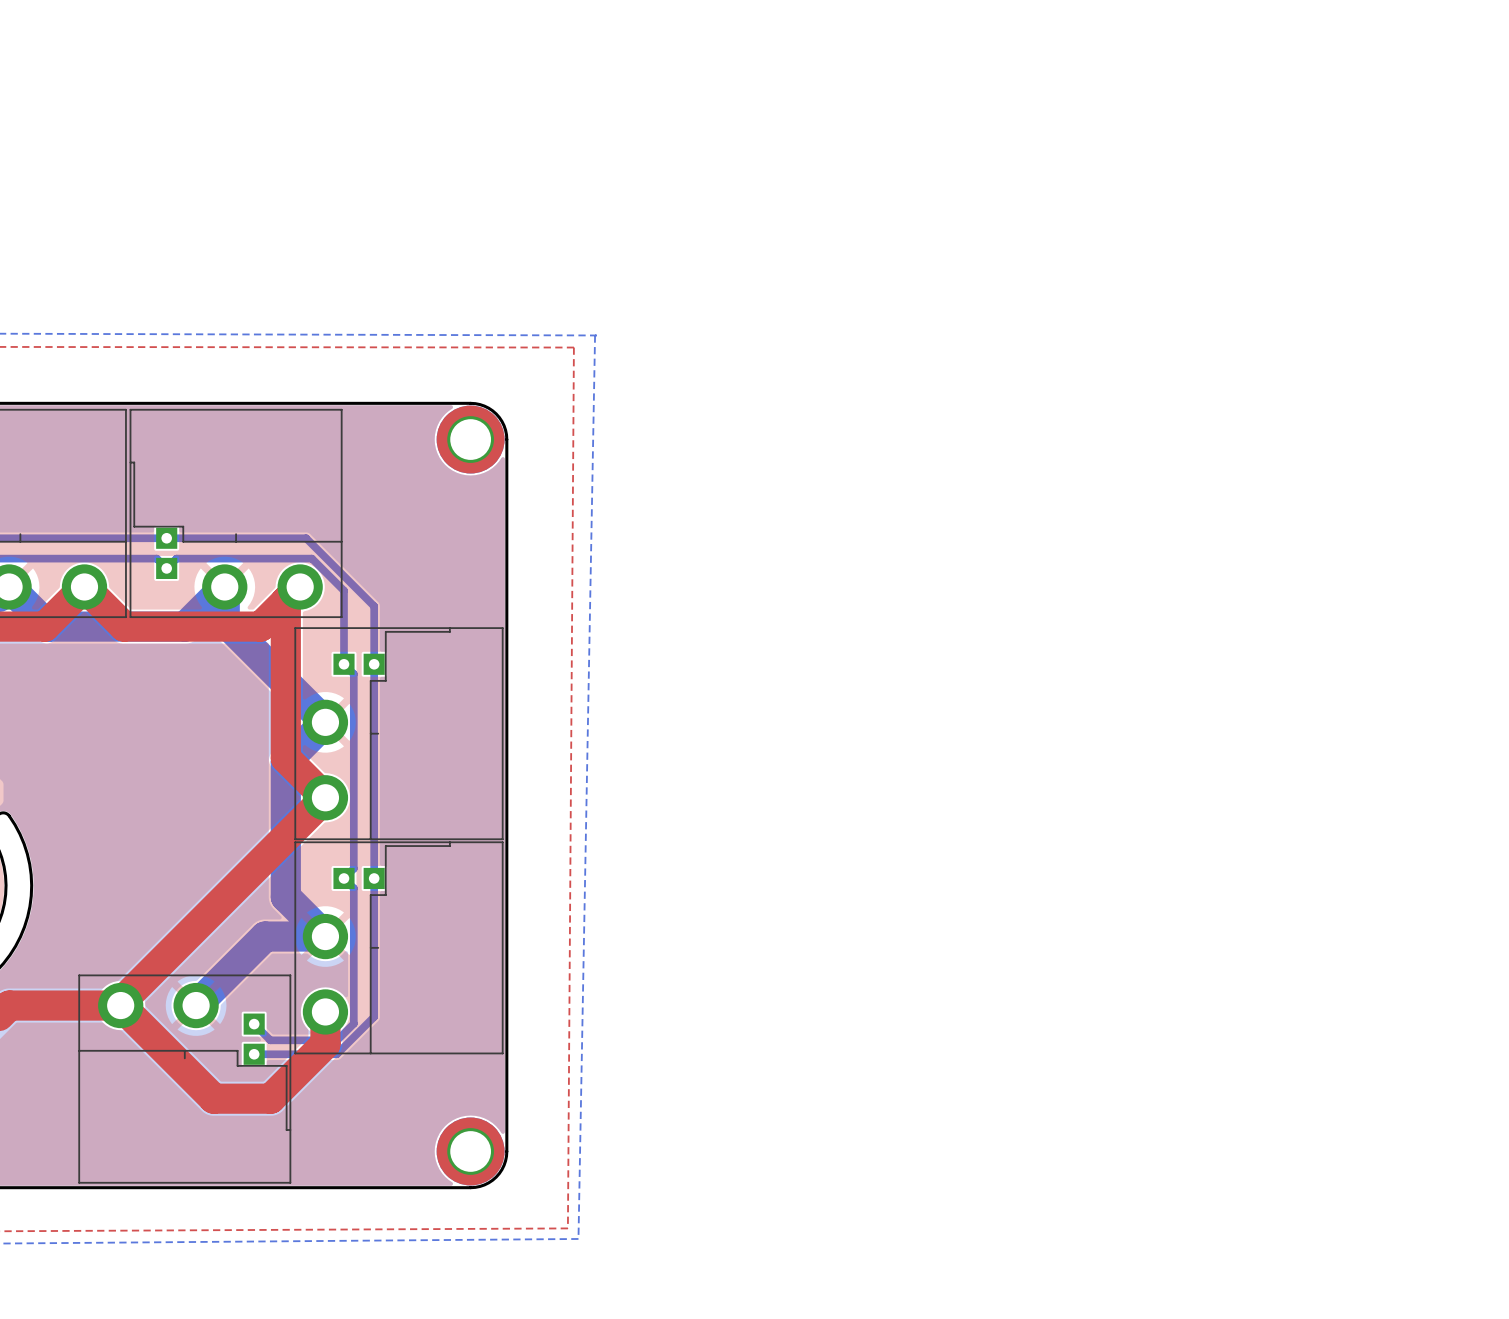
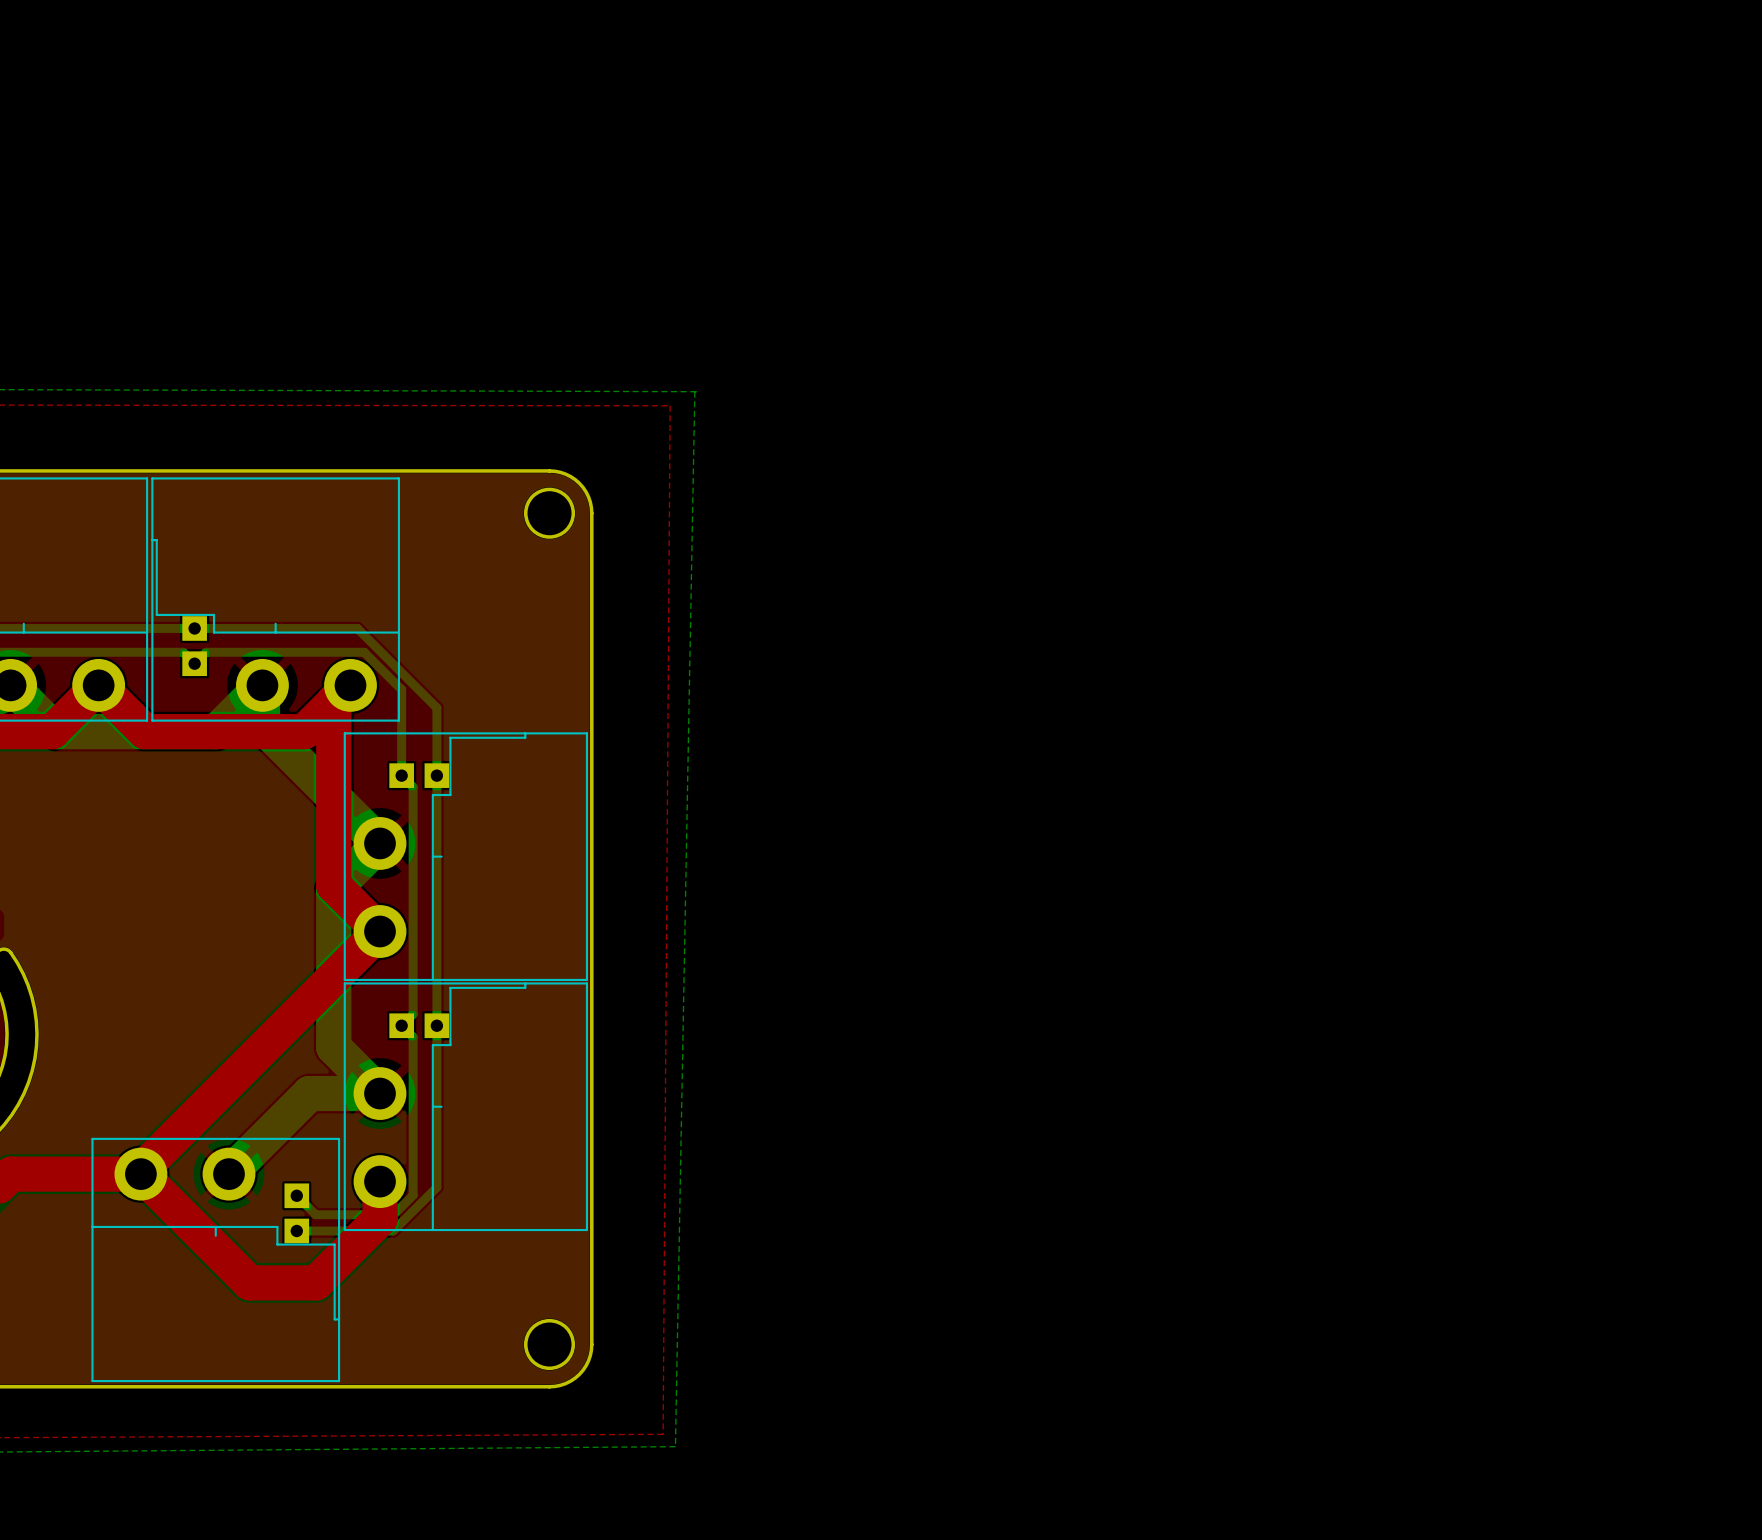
round board edge: none -> [523, 487, 576, 539]
part: (470, 439) -> none
round board edge: none -> [523, 1318, 576, 1371]
part: (470, 1151) -> none

